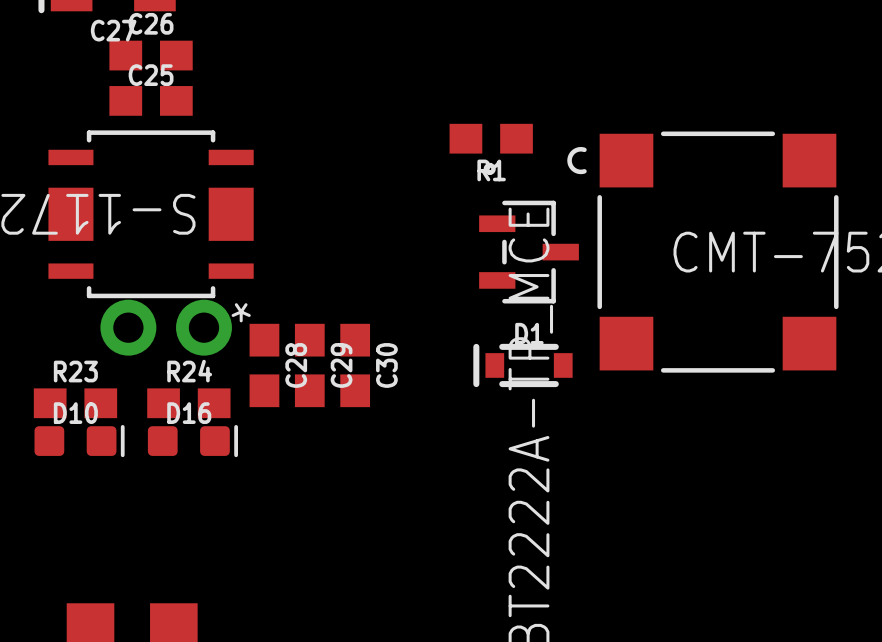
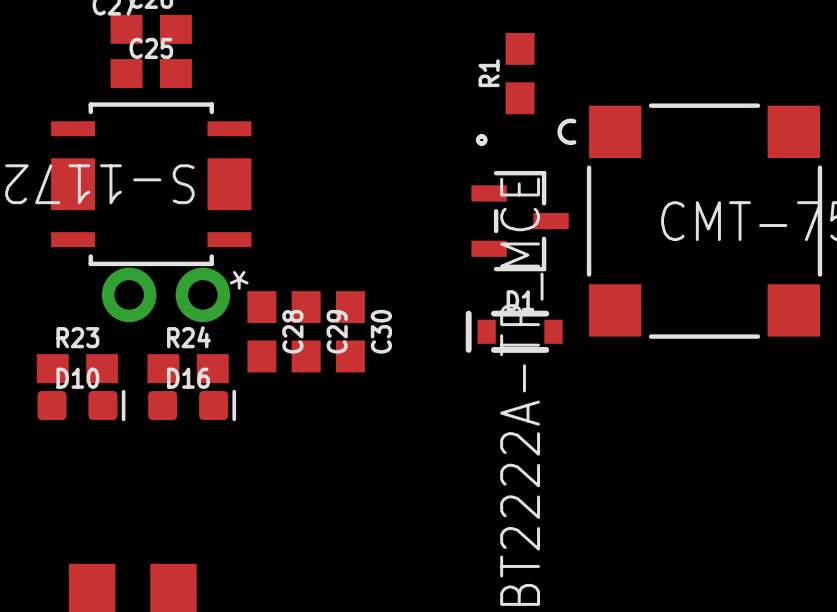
R1 rotation: 0° (491, 138) -> 90° clockwise (520, 73)
R1 position: (491, 138) -> (520, 73)

